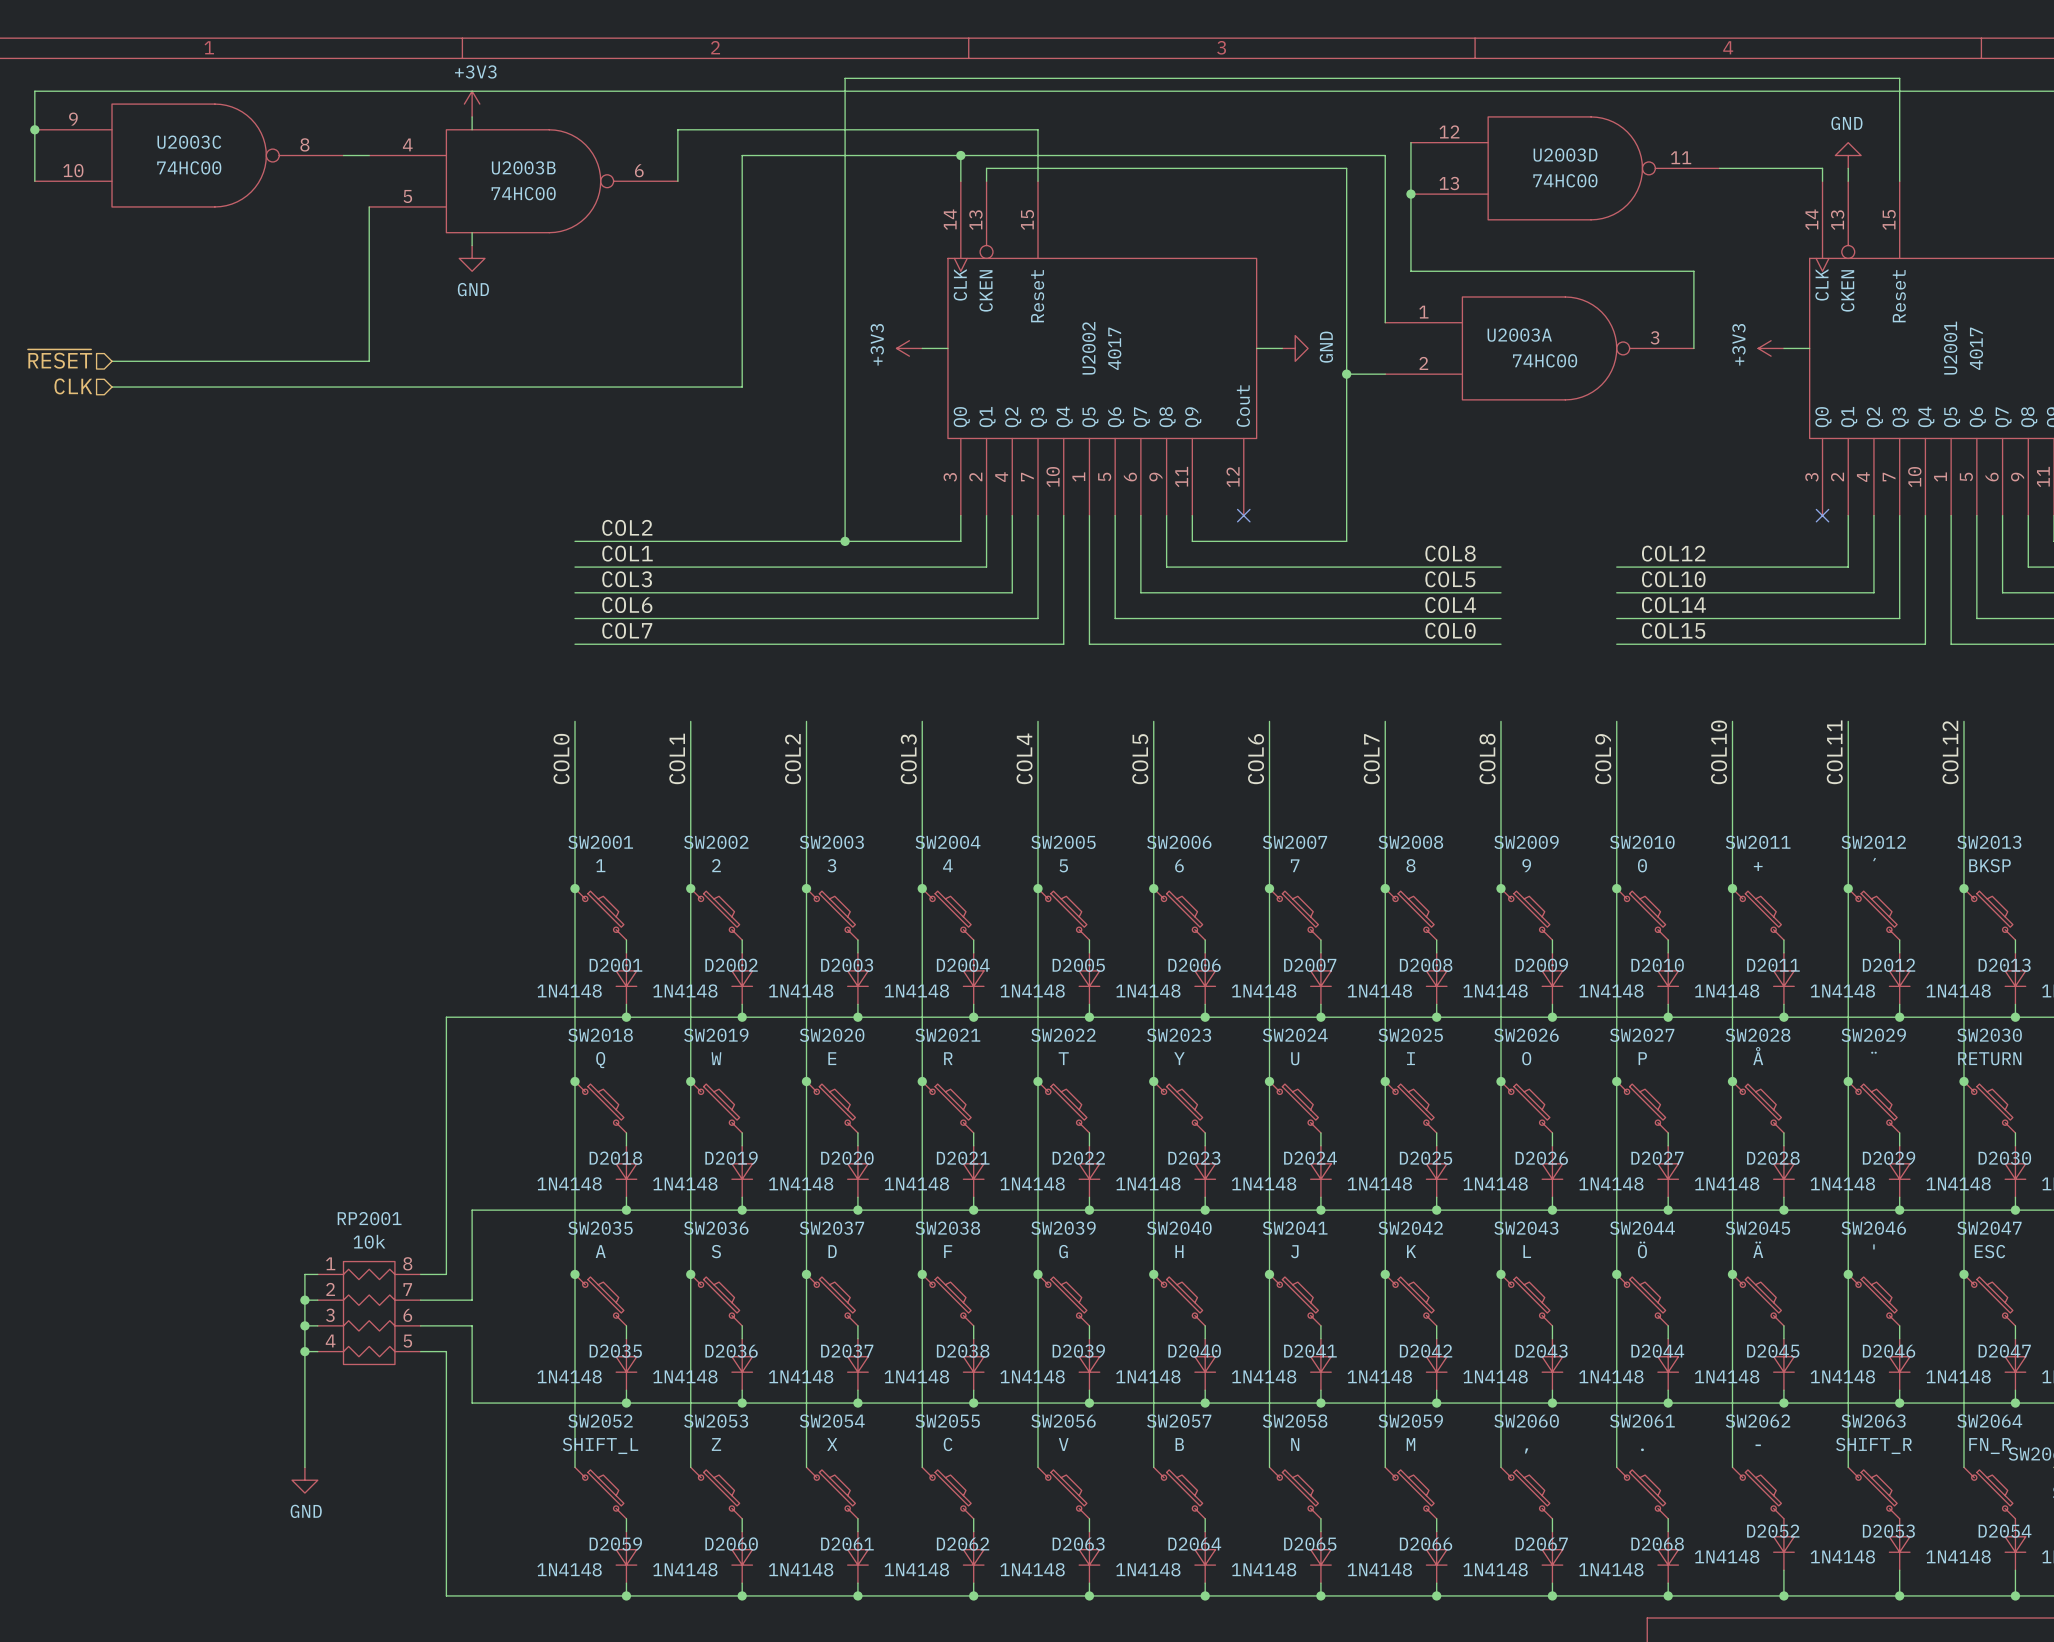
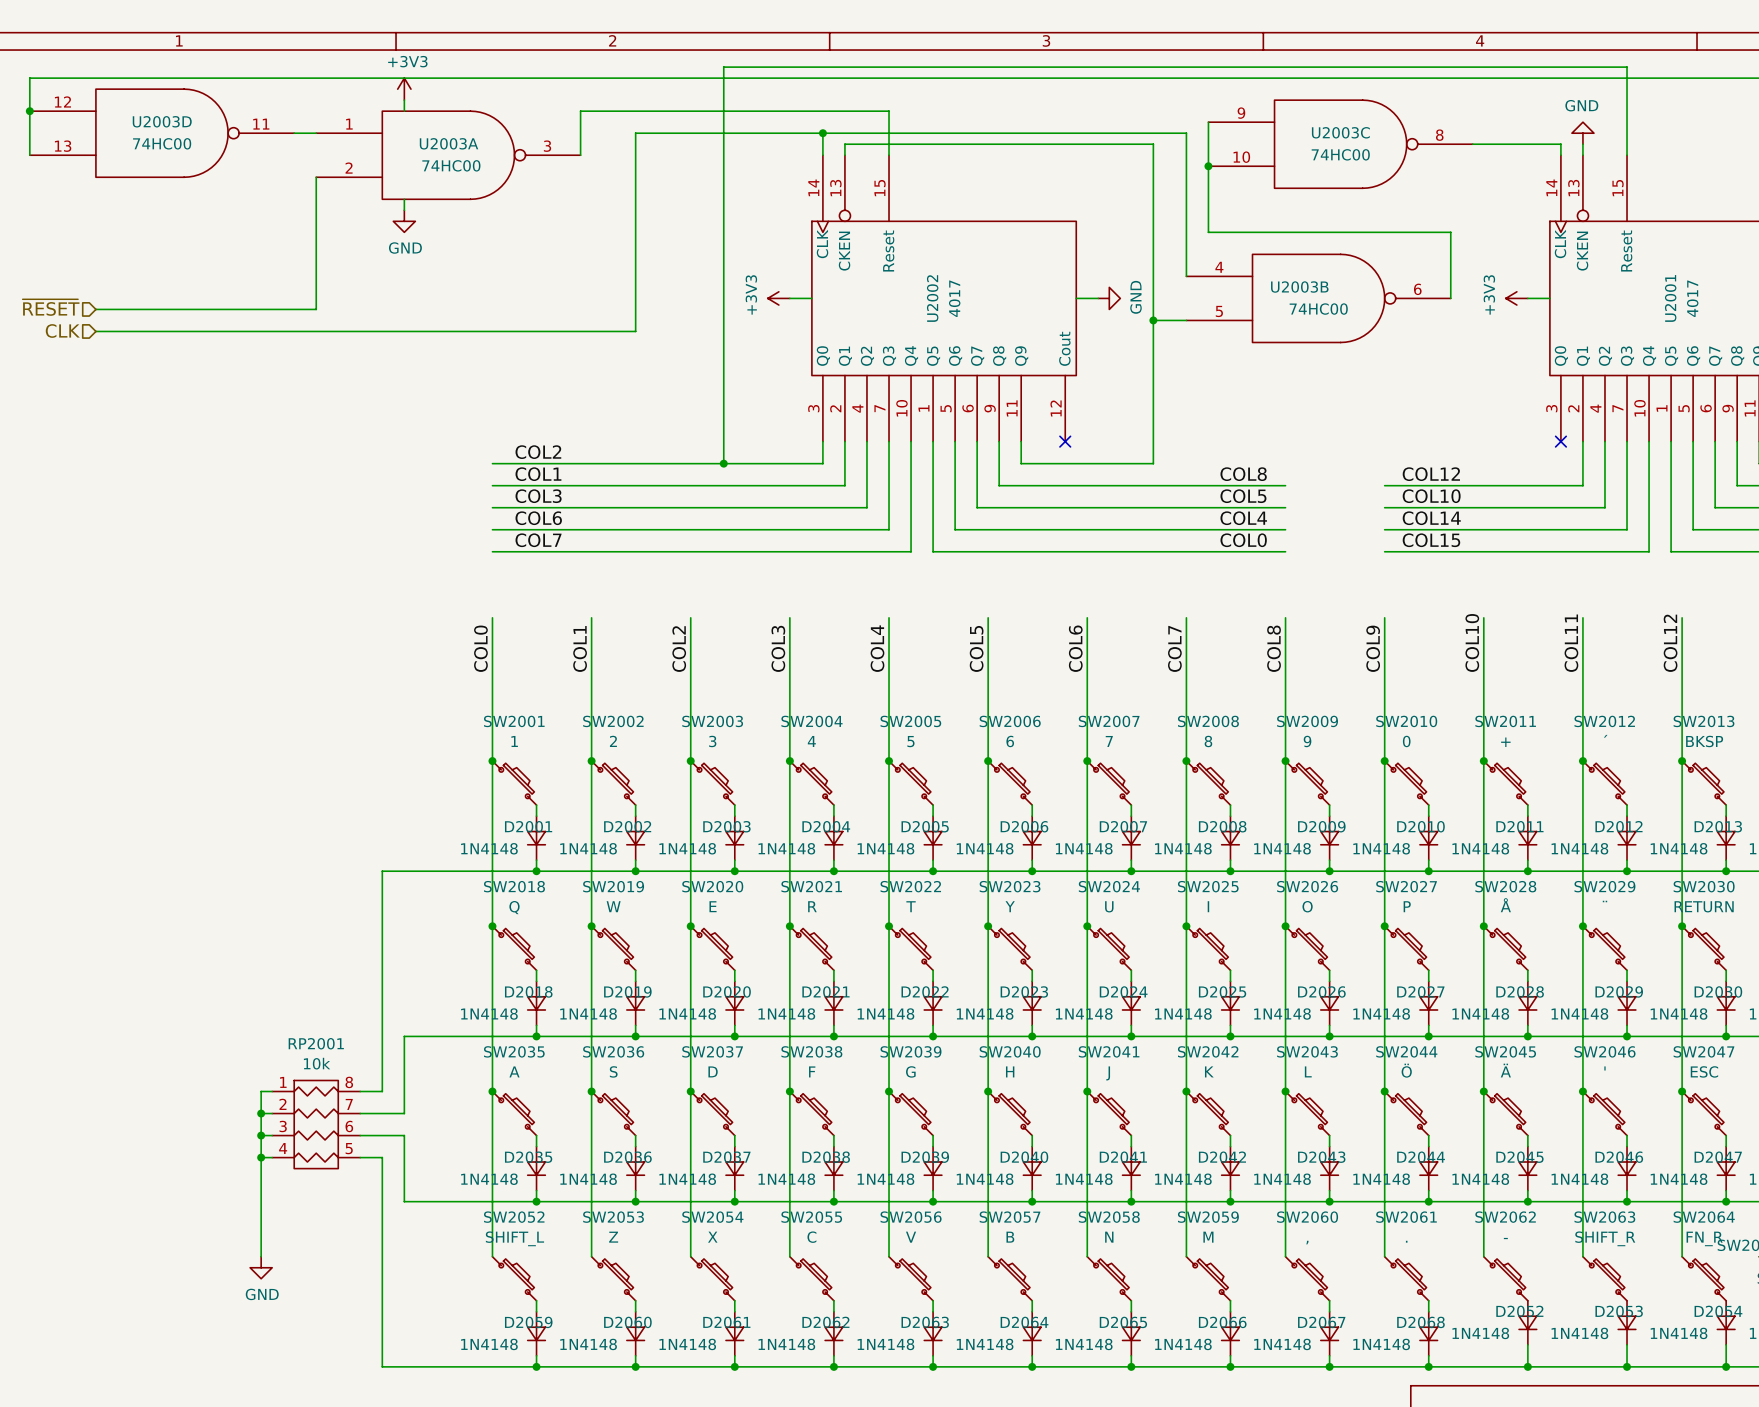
U2003C position: (189, 155) -> (1340, 144)
U2003B name position: U2003B (523, 167) -> U2003B (1299, 287)
U2003D position: (1565, 168) -> (162, 133)
U2003B position: (523, 181) -> (1318, 298)
U2003A name position: U2003A (1519, 335) -> U2003A (449, 143)
U2003A position: (1539, 348) -> (448, 155)

